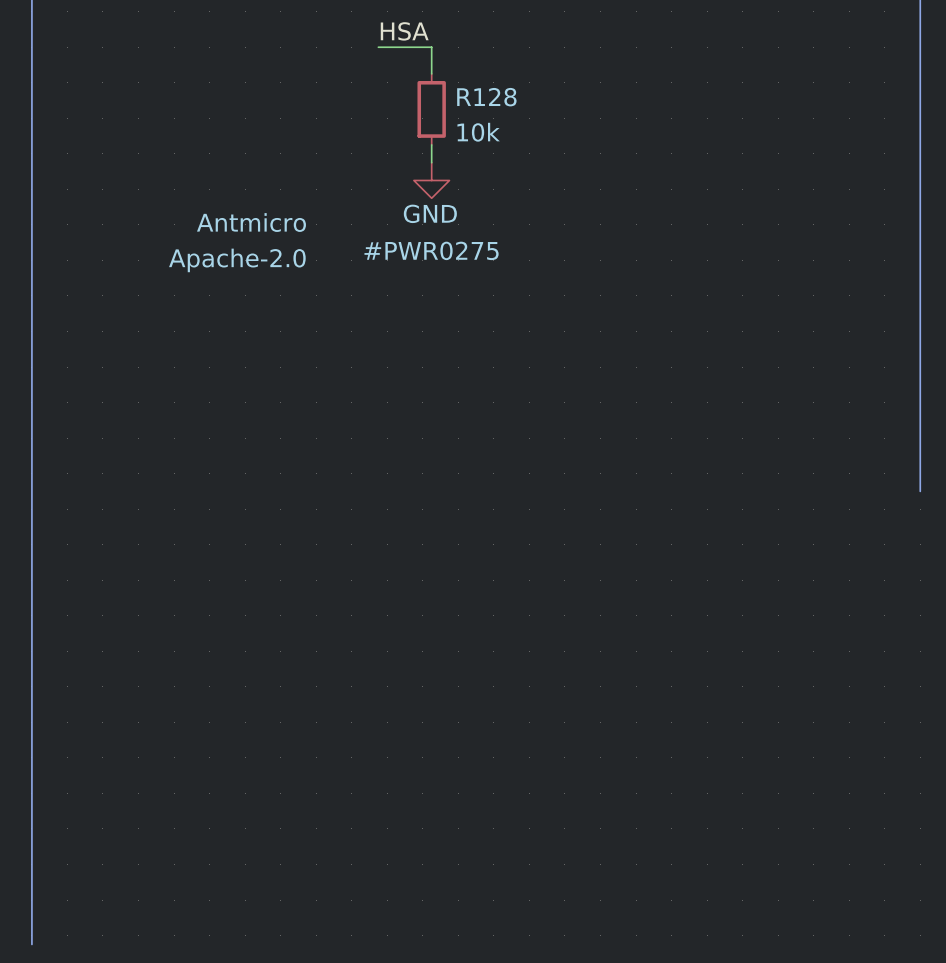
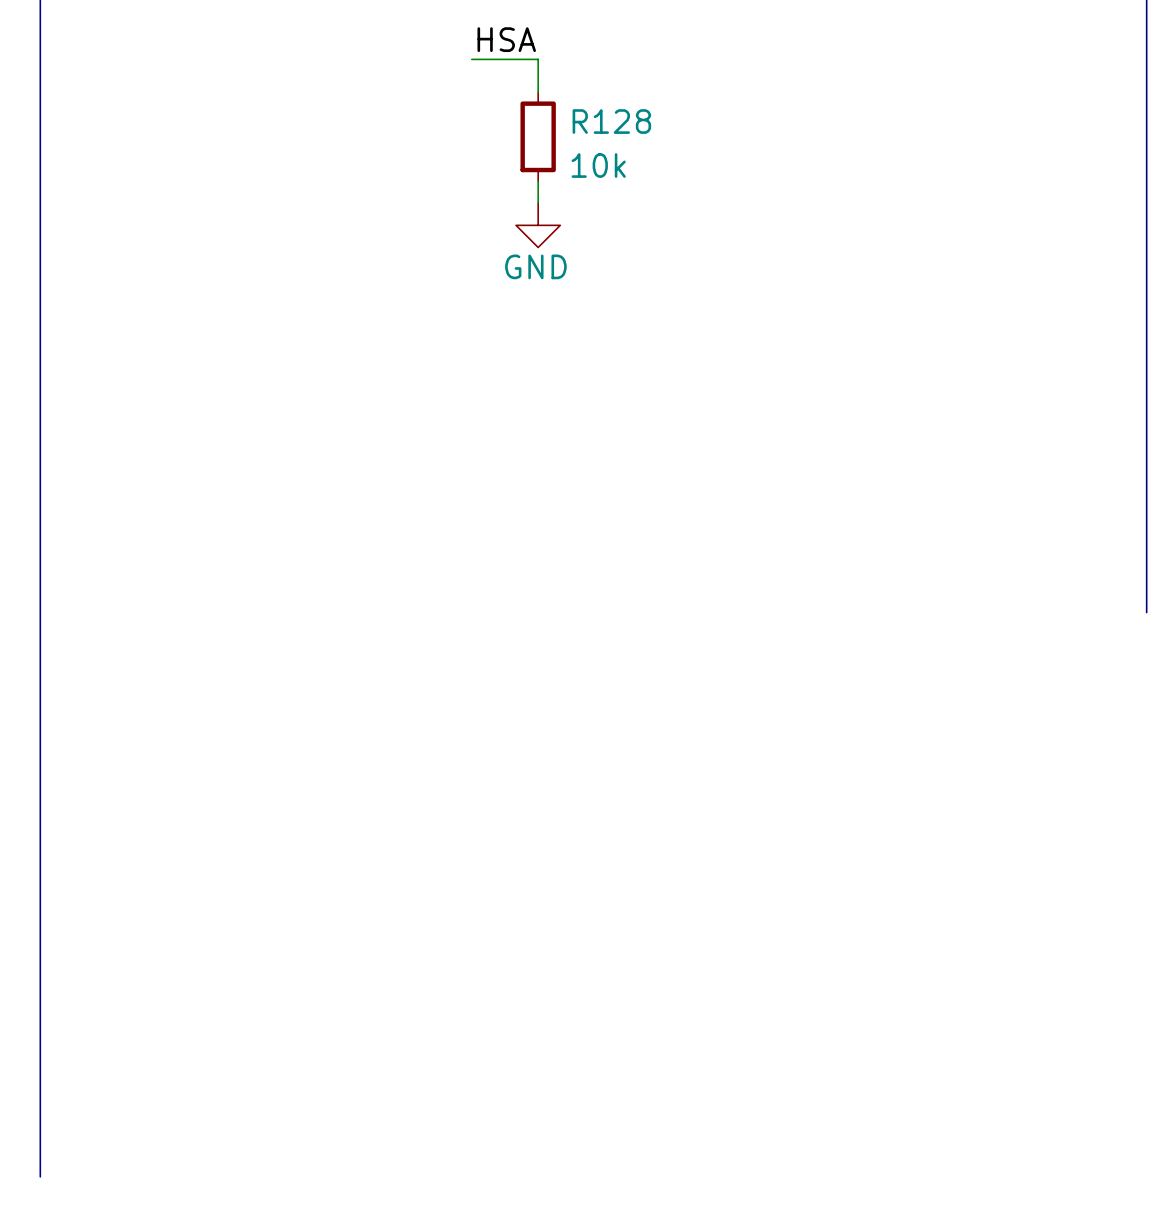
#PWR0275 text: Antmicro (251, 222) -> none
#PWR0275 name: #PWR0275 (431, 250) -> none
#PWR0275 text: Apache-2.0 (237, 260) -> none

